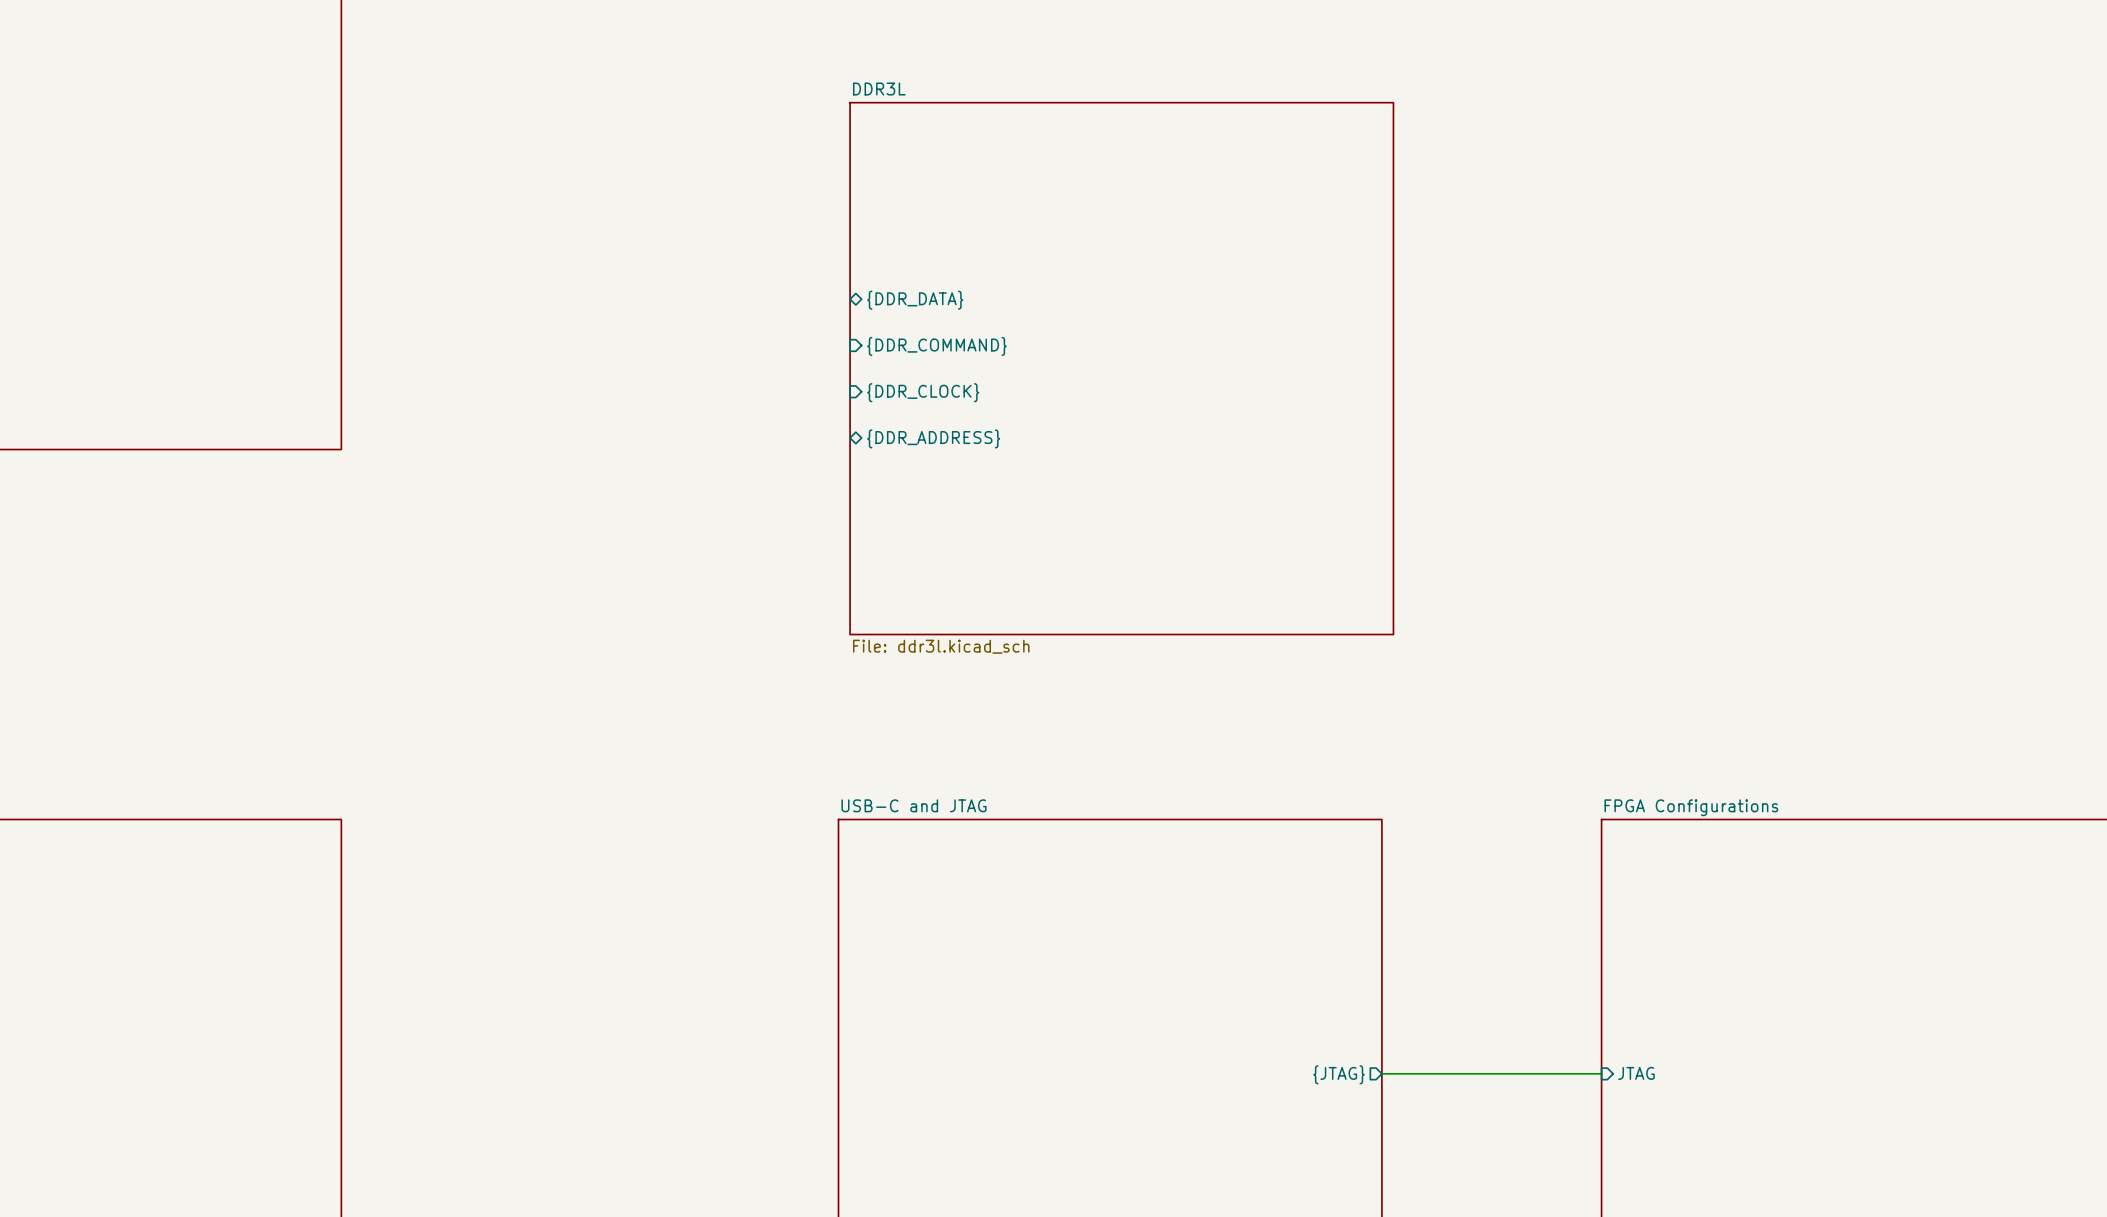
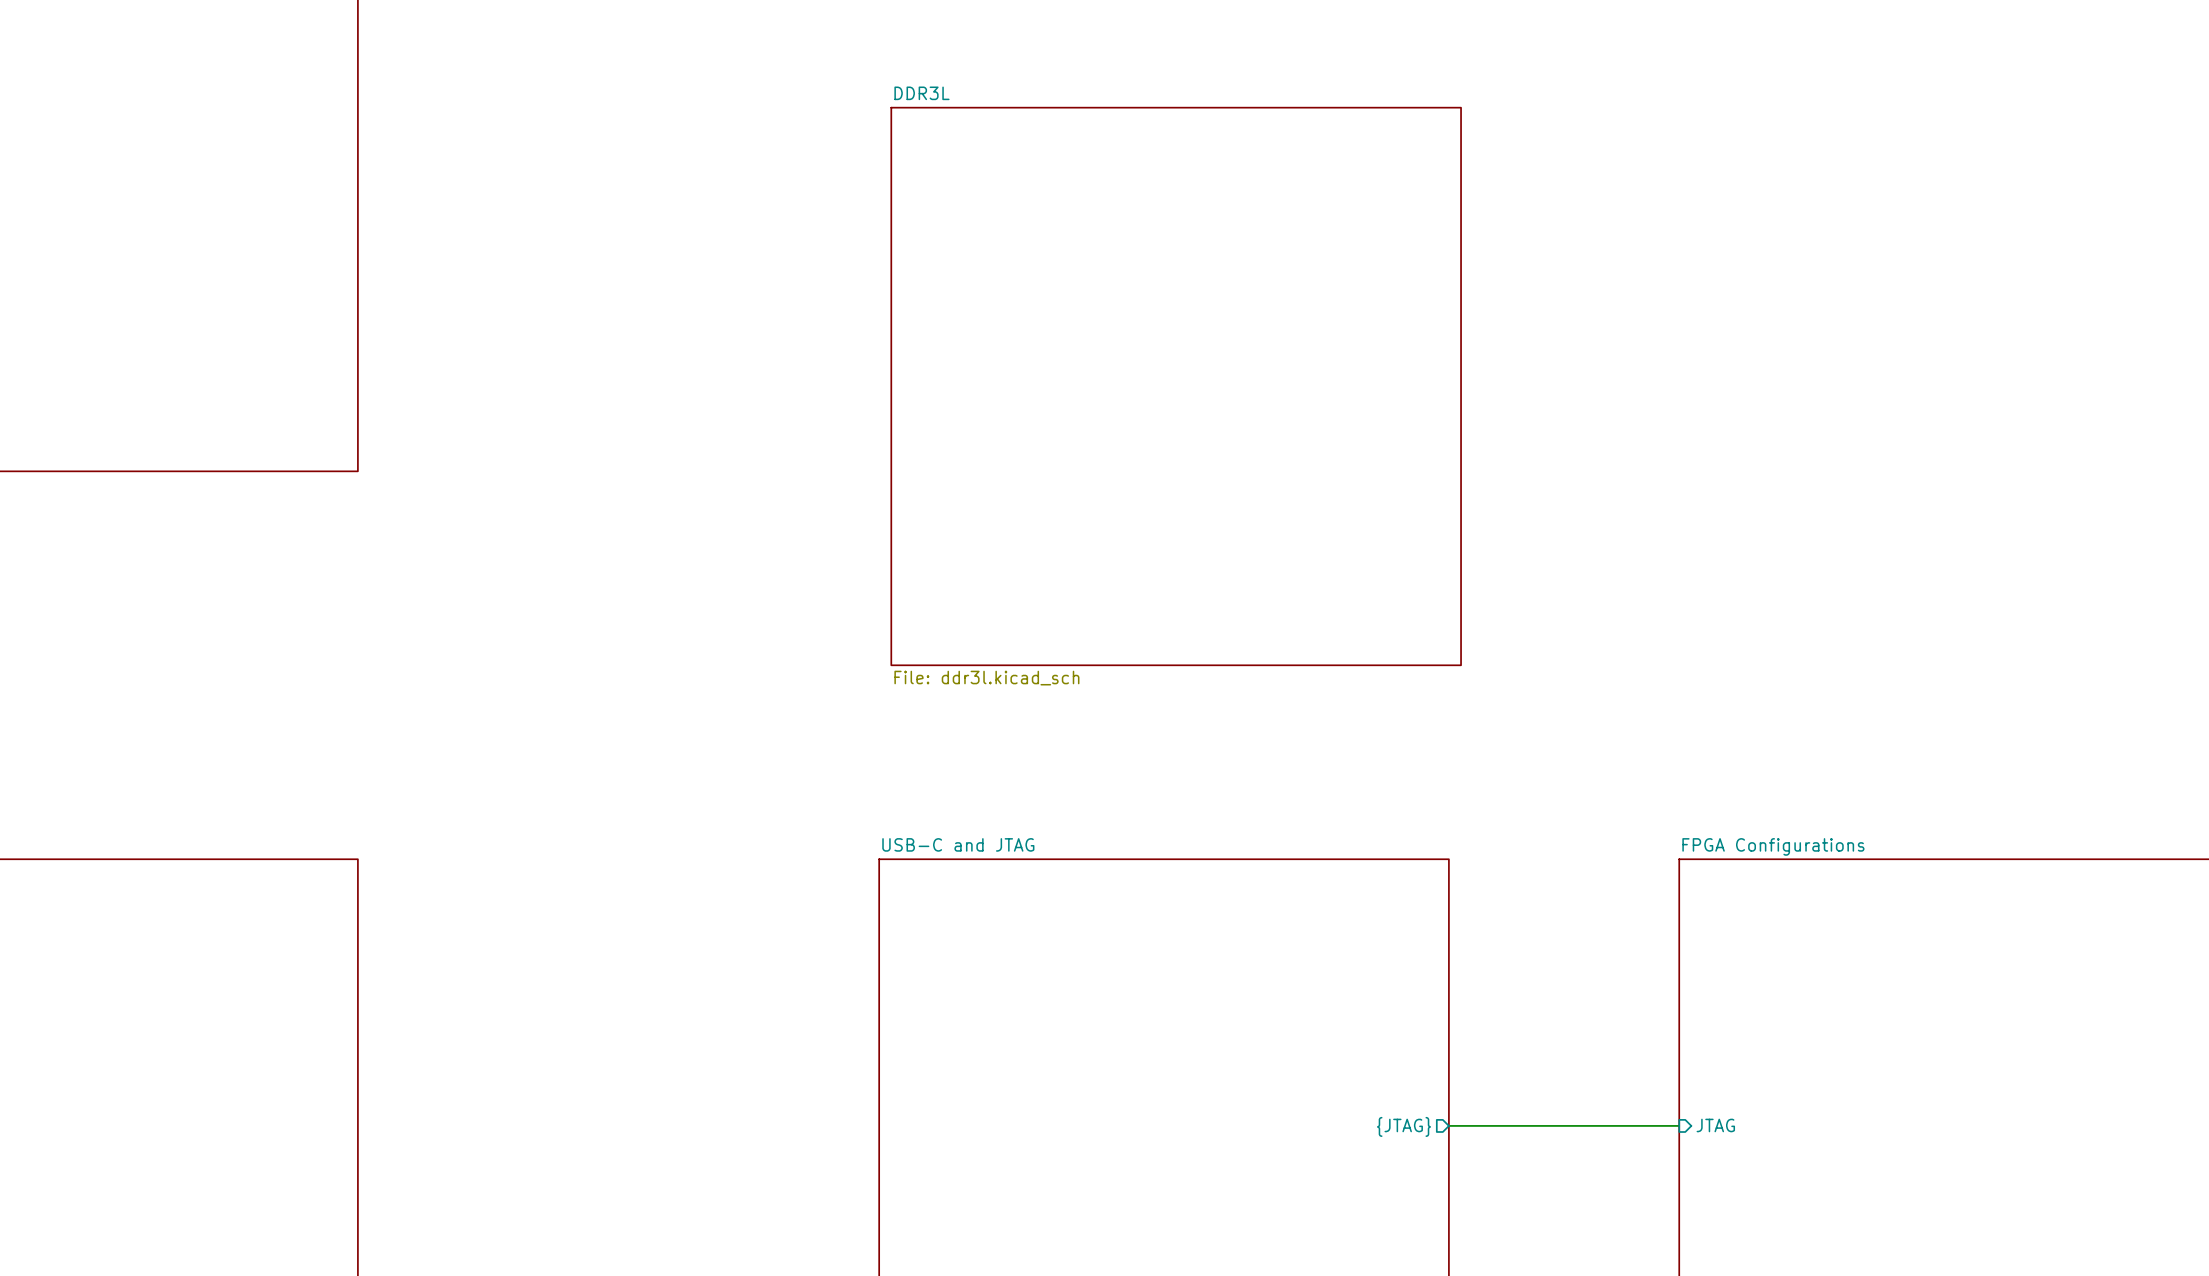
sheet pin: {DDR_DATA} (915, 300) -> none
sheet pin: {DDR_COMMAND} (936, 346) -> none
sheet pin: {DDR_CLOCK} (923, 392) -> none
sheet pin: {DDR_ADDRESS} (933, 438) -> none

